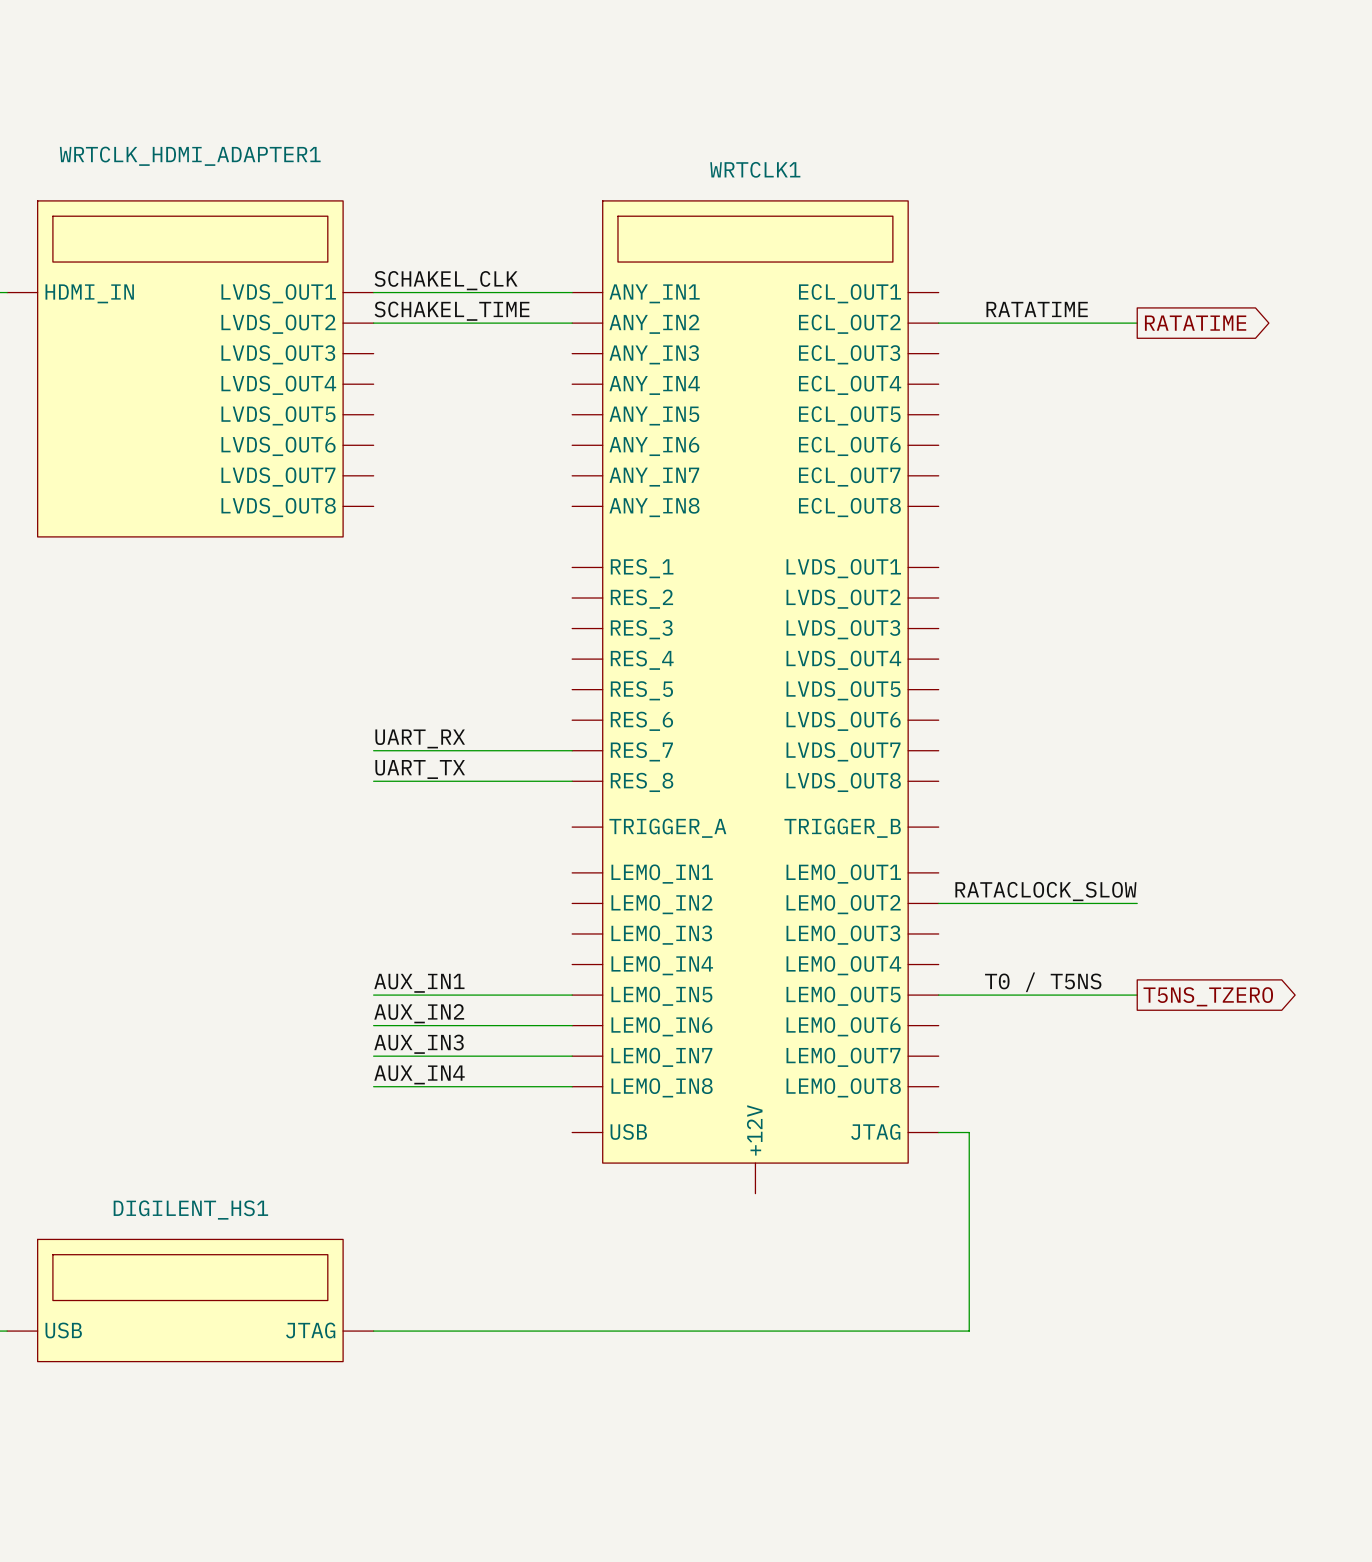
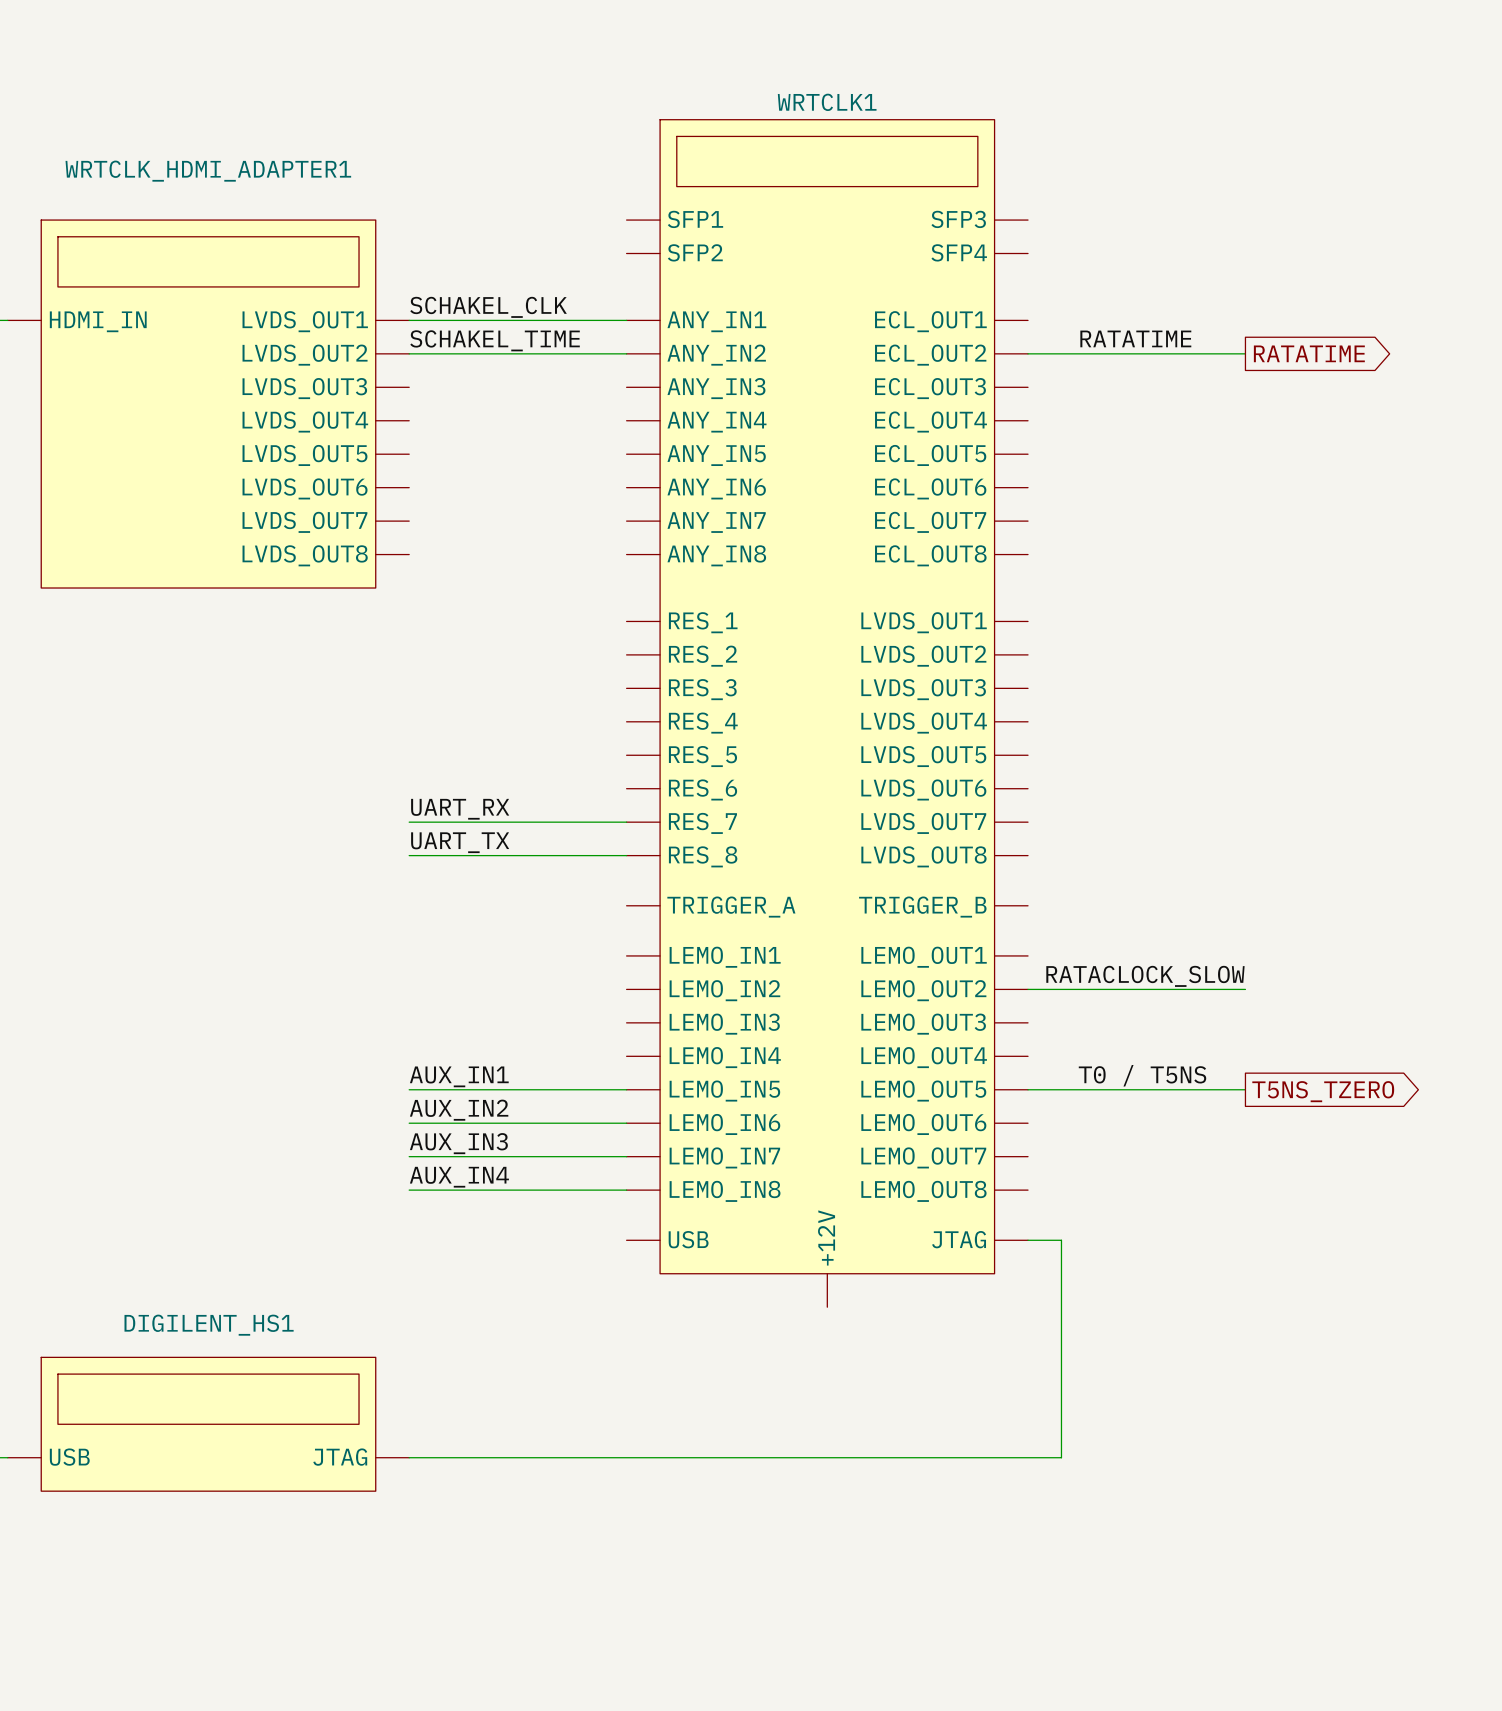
WRTCLK1 name position: WRTCLK1 (755, 169) -> WRTCLK1 (827, 102)
WRTCLK1 symbol: [572, 200, 939, 1194] -> [626, 119, 1029, 1308]

